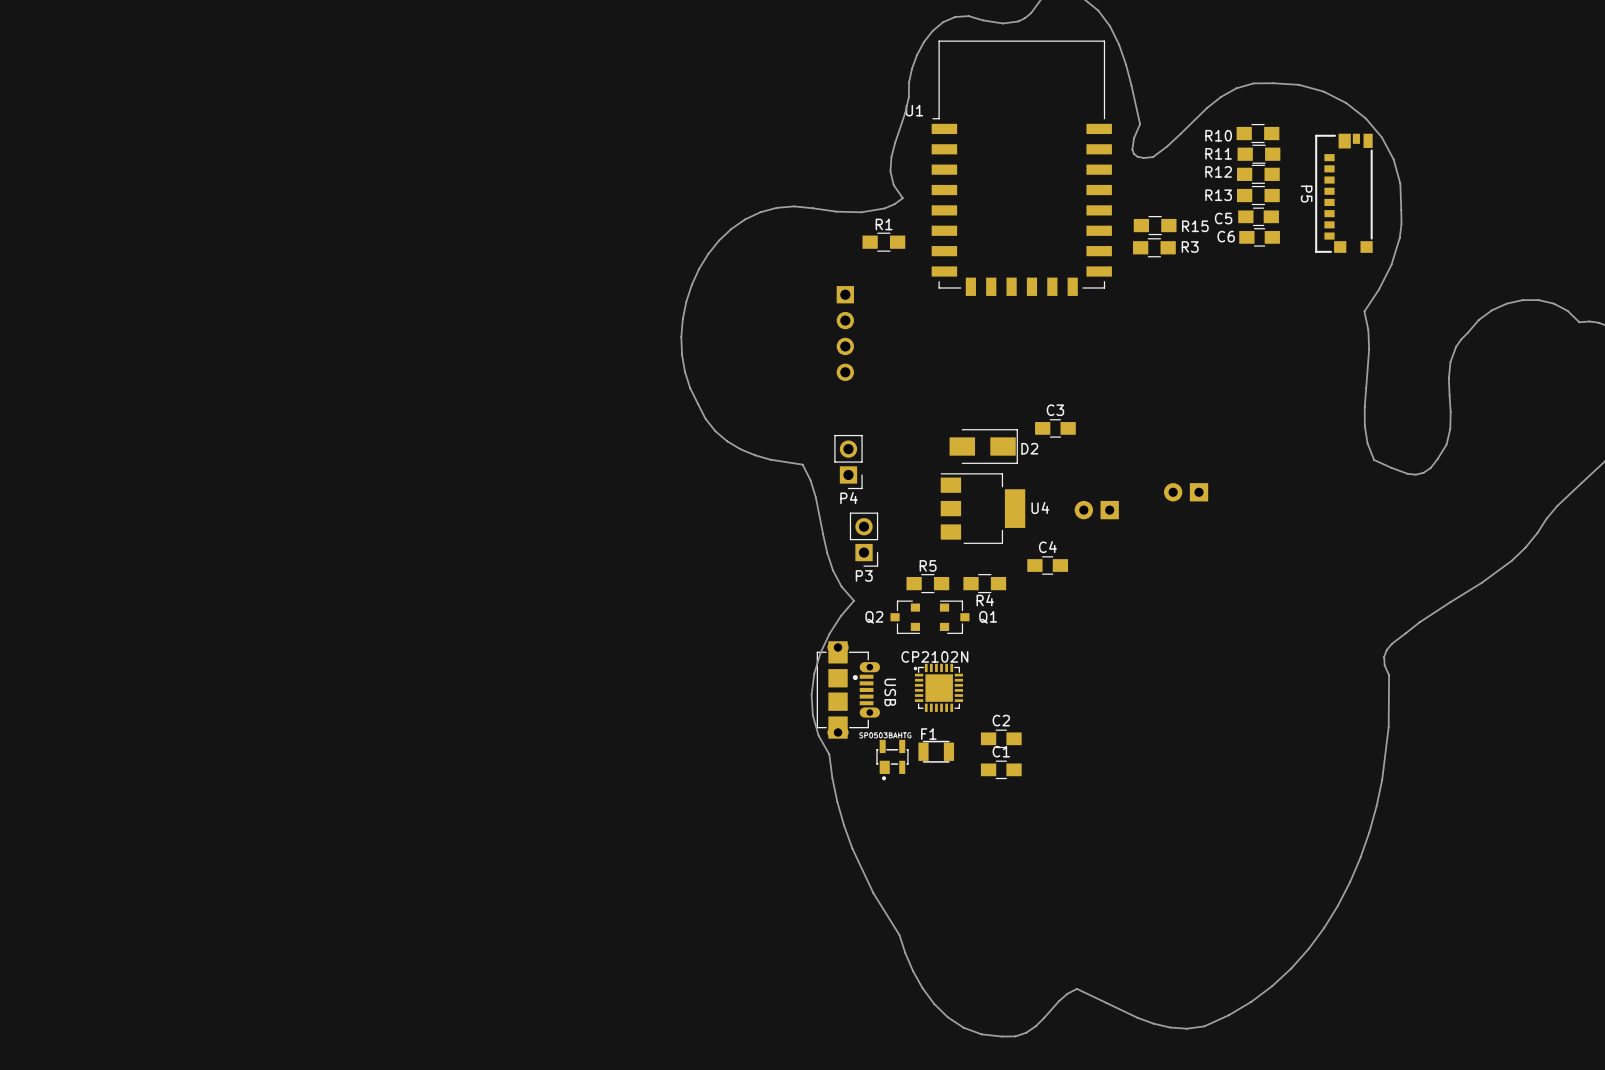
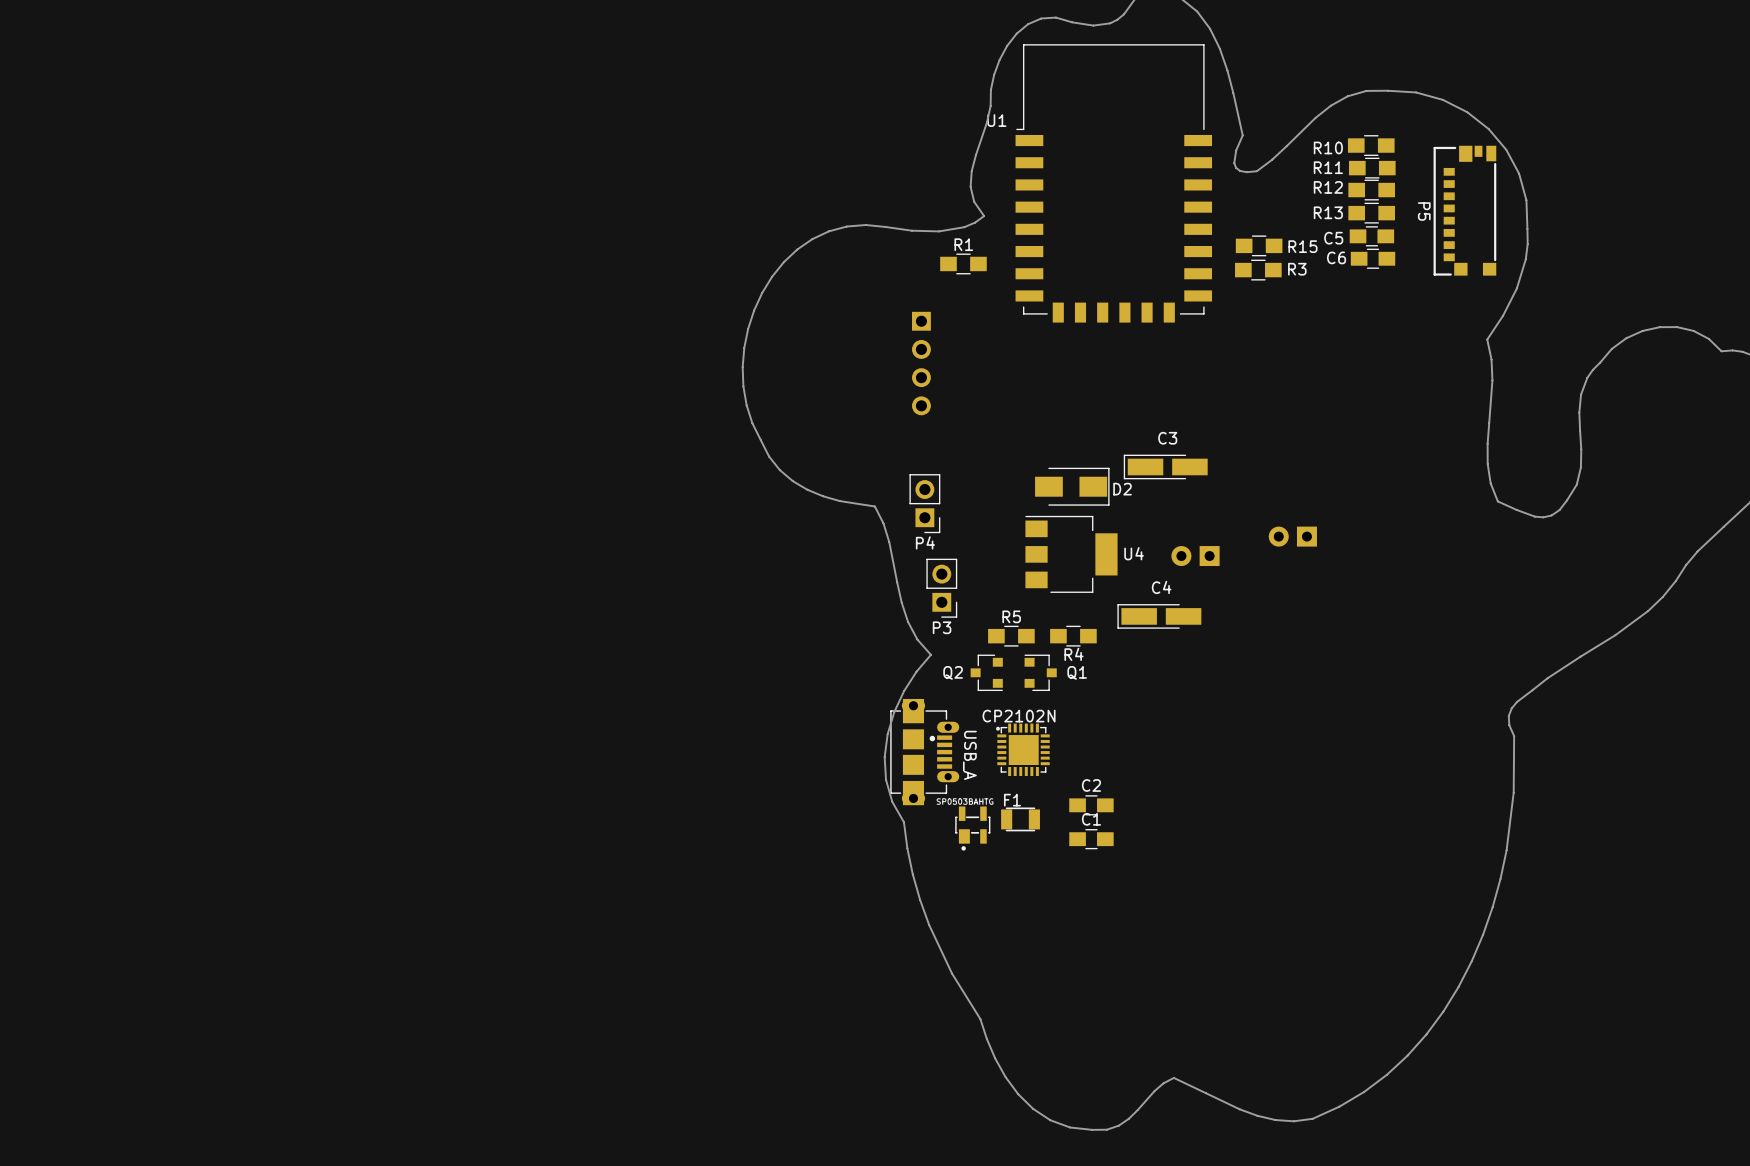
C3 footprint: [1035, 419, 1076, 438] -> [1123, 454, 1208, 480]
C4 footprint: [1027, 556, 1069, 575] -> [1117, 604, 1202, 629]
part value: USB (890, 692) -> USB_A (969, 755)

